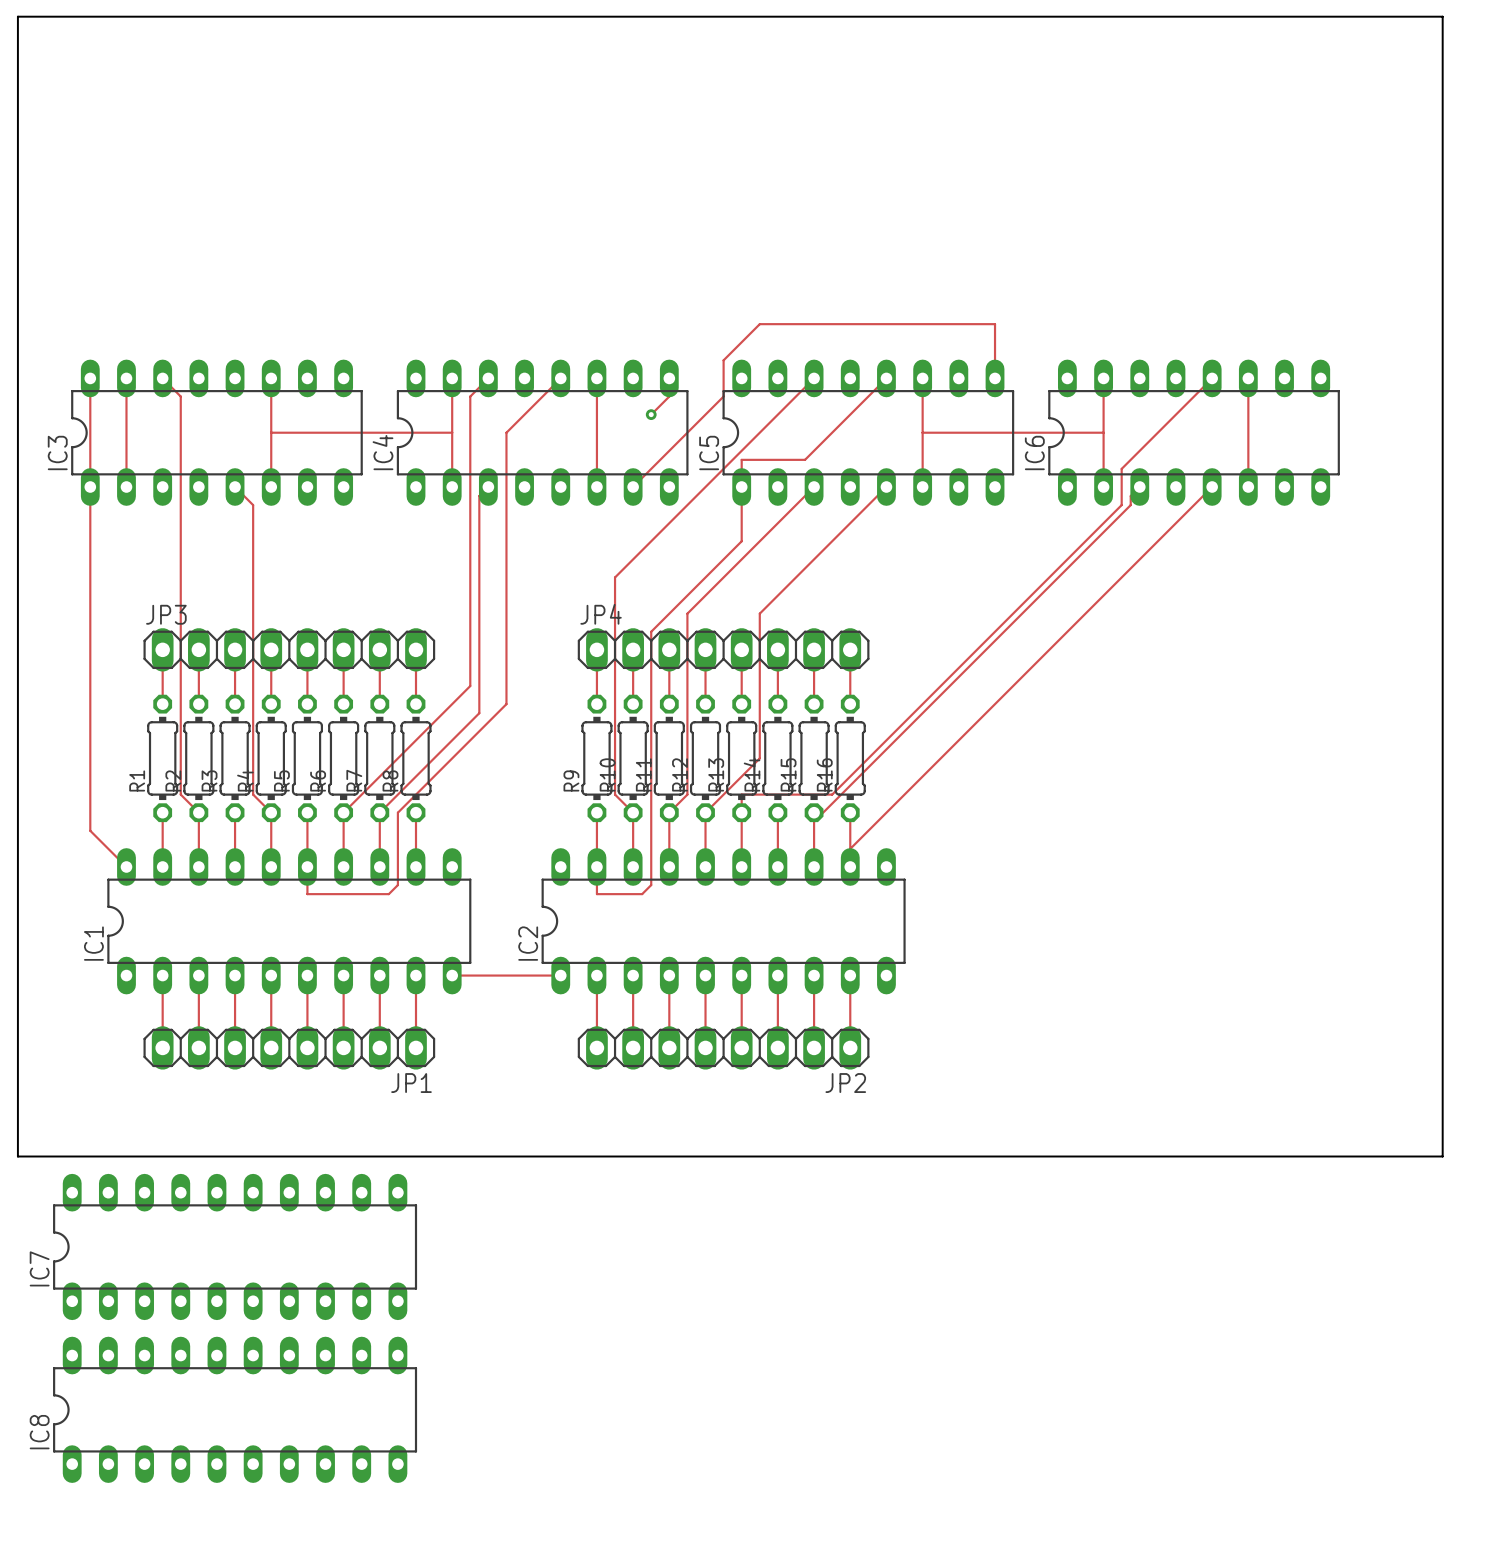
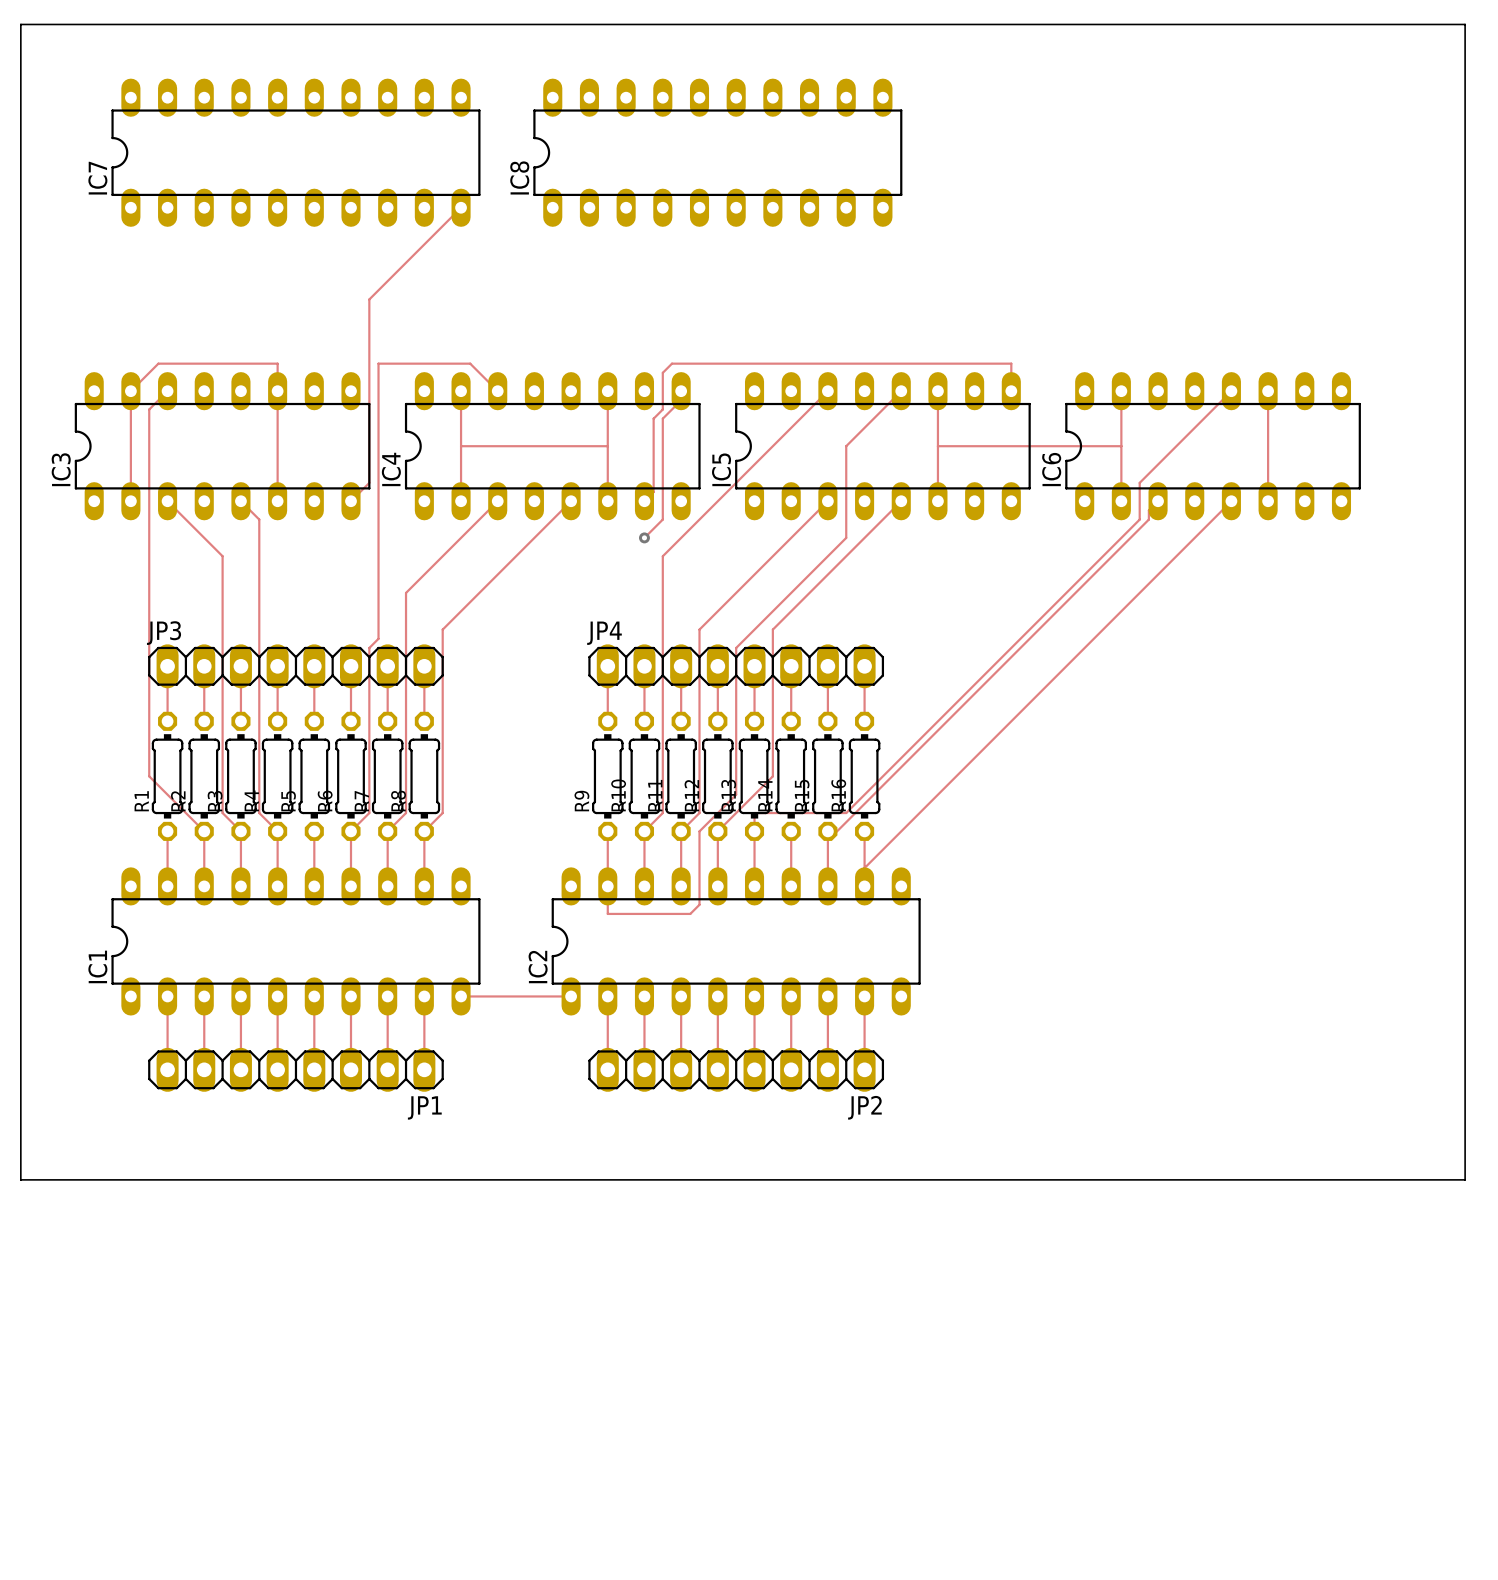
track: none -> (461, 207) (369, 299) (369, 482) (351, 501)
track: (995, 351) (995, 324) (759, 324) (723, 360) (723, 396) (642, 477) -> (1011, 363) (671, 363) (662, 372) (662, 409) (653, 418) (653, 492)
track: (90, 378) (90, 830) (126, 866) -> none
track: none -> (130, 391) (158, 363) (277, 363) (277, 391)
track: (162, 378) (180, 396) (180, 794) -> (167, 391) (149, 409) (149, 776) (185, 813)
track: (488, 378) (470, 396) (470, 686) (361, 794) -> (497, 391) (470, 363) (378, 363) (378, 638) (369, 647) (369, 813)
track: (560, 378) (506, 432) (506, 704) (397, 812) (397, 885) (388, 894) (307, 894) (307, 866) -> none
track: (669, 387) (669, 396) (651, 414) -> (681, 400) (662, 418) (662, 519) (644, 537)
via: (651, 414) -> none
track: (271, 432) (452, 432) -> (607, 446) (461, 446)
track: (832, 432) (805, 459) (741, 459) (741, 541) (651, 631) -> (846, 446) (846, 537) (736, 647) (736, 794) (699, 831) (699, 904) (690, 913) (653, 913)
track: none -> (167, 501) (222, 556) (222, 813) (240, 831)
track: none -> (571, 501) (442, 629) (442, 813) (424, 831)
track: (479, 496) (479, 713) (397, 794) -> (488, 510) (406, 592) (406, 813)
via: none -> (644, 537)
track: (651, 541) (615, 577) (615, 794) (633, 812) -> (662, 556) (662, 647)
track: (651, 794) (651, 885) (642, 894) -> (662, 813) (644, 831)
IC7 position: (235, 1246) -> (295, 152)
IC8 position: (235, 1409) -> (717, 152)

